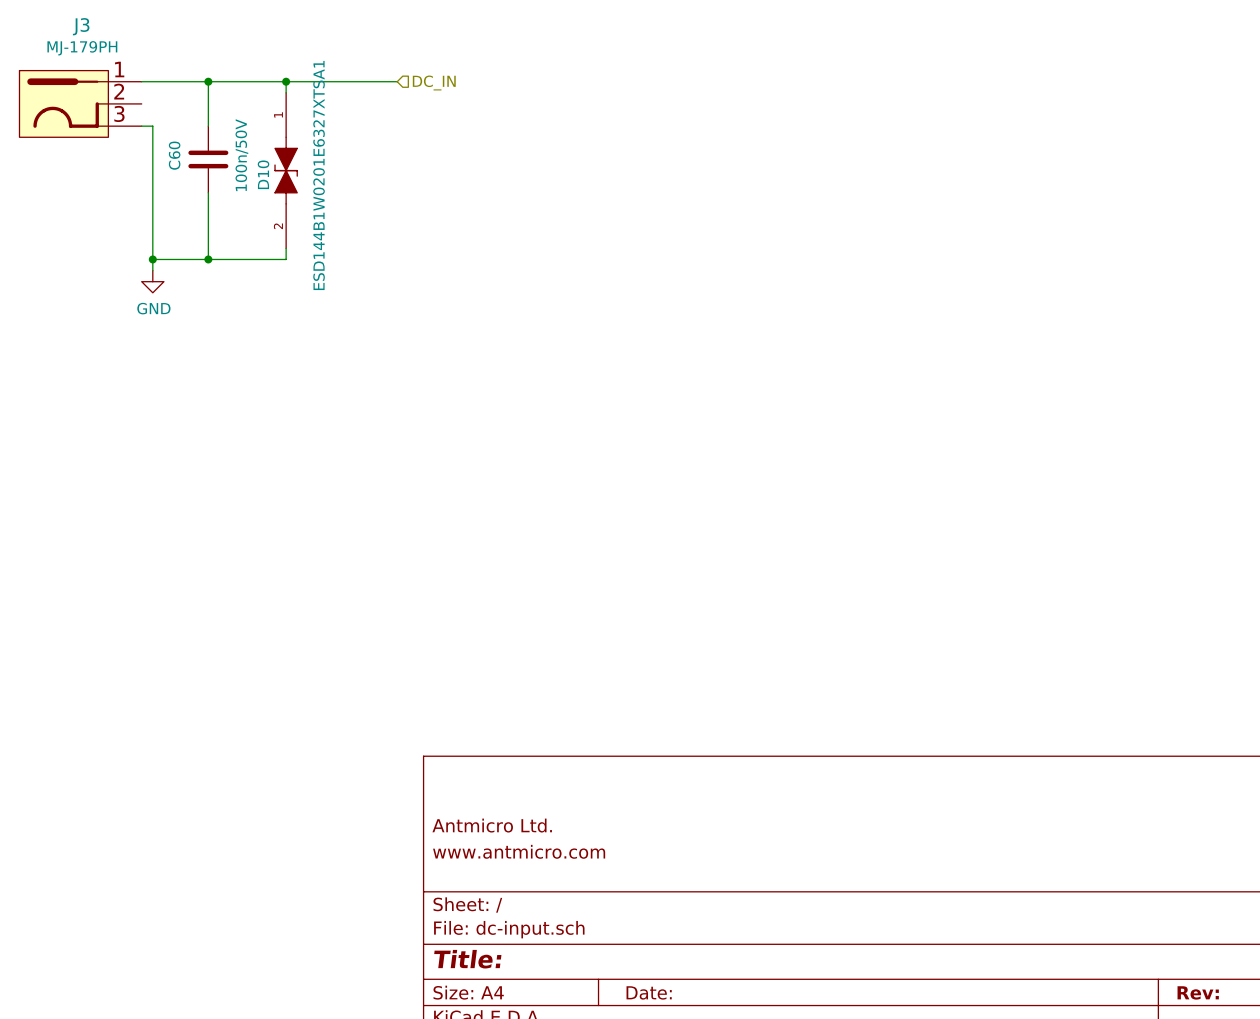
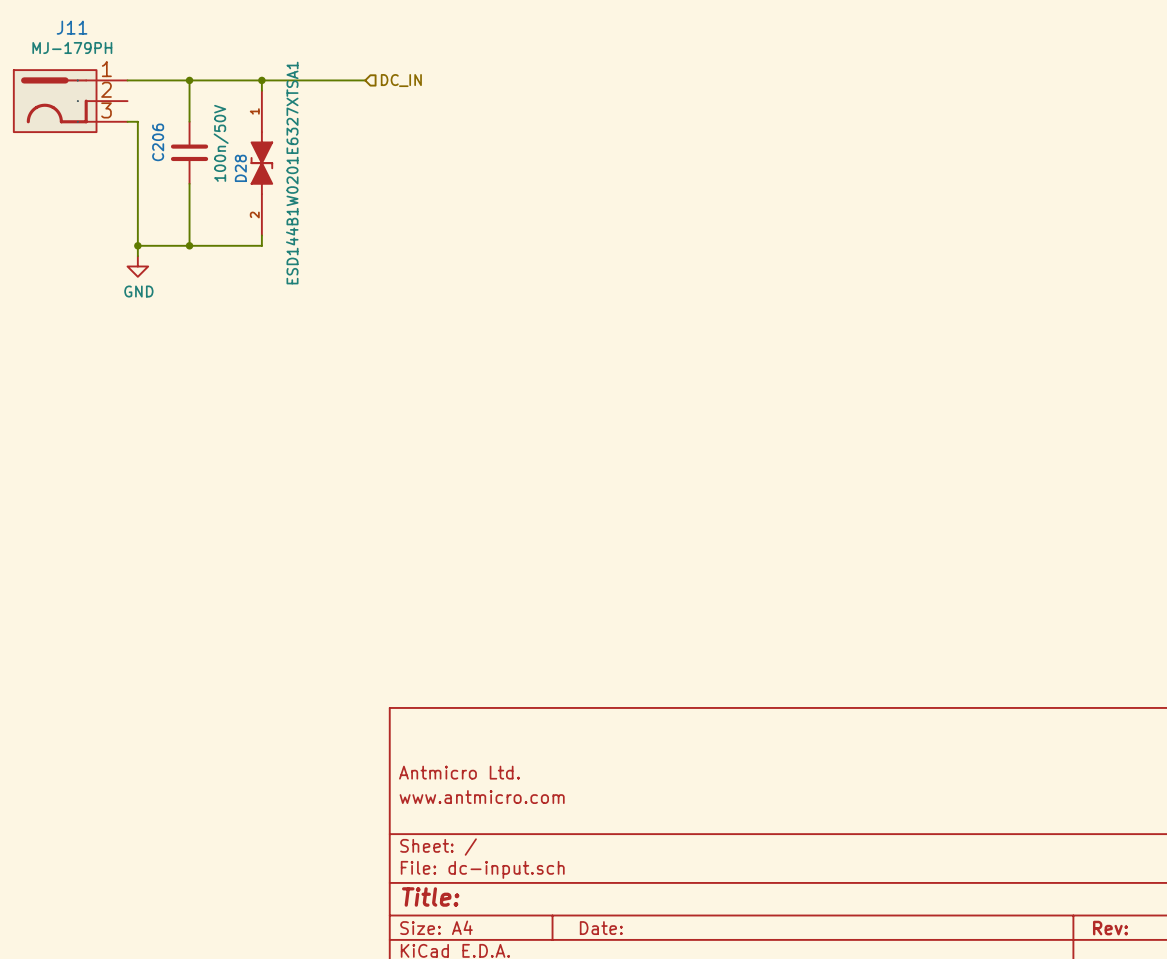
J3 name: J3 (81, 26) -> J11 (72, 27)
C60 name: C60 (174, 155) -> C206 (158, 142)
D10 name: D10 (263, 174) -> D28 (240, 168)

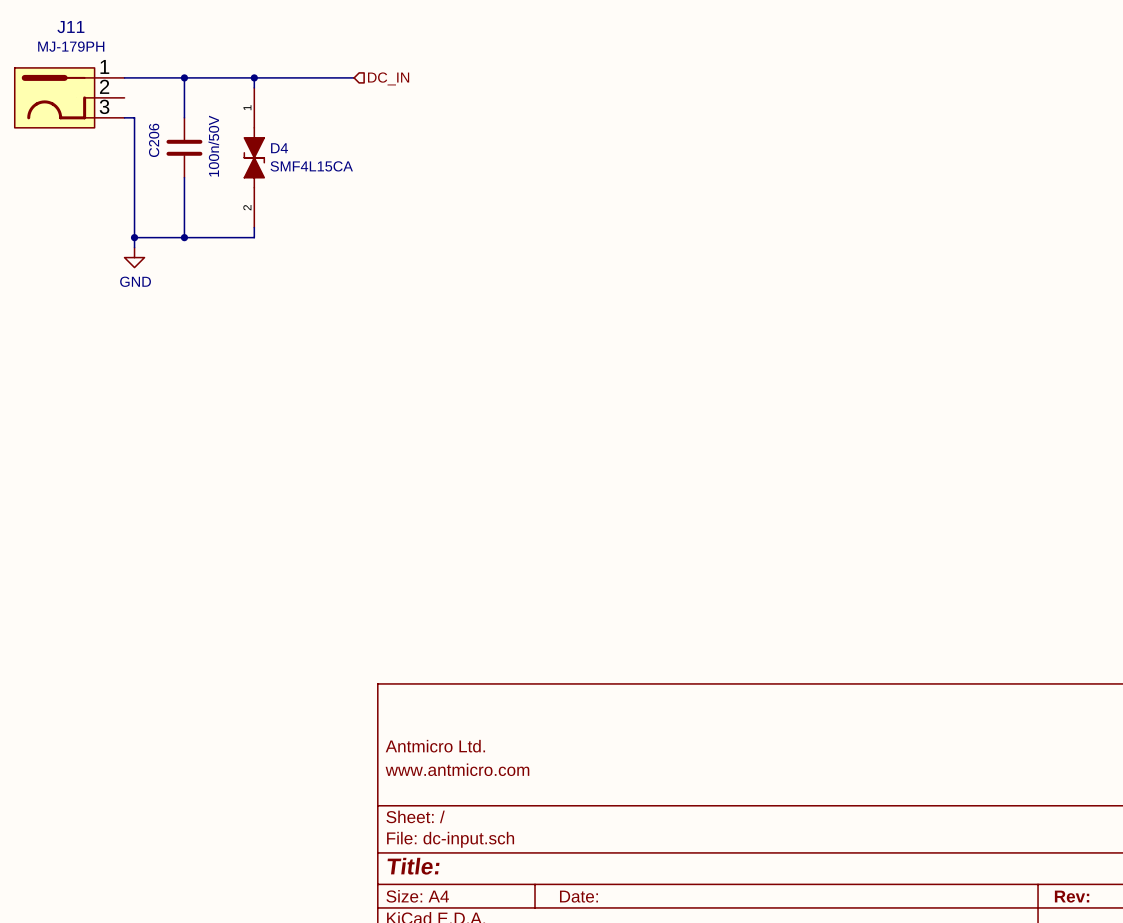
D28 name: D28 (240, 168) -> D4 (279, 148)
D28 value: ESD144B1W0201E6327XTSA1 (292, 173) -> SMF4L15CA (311, 166)

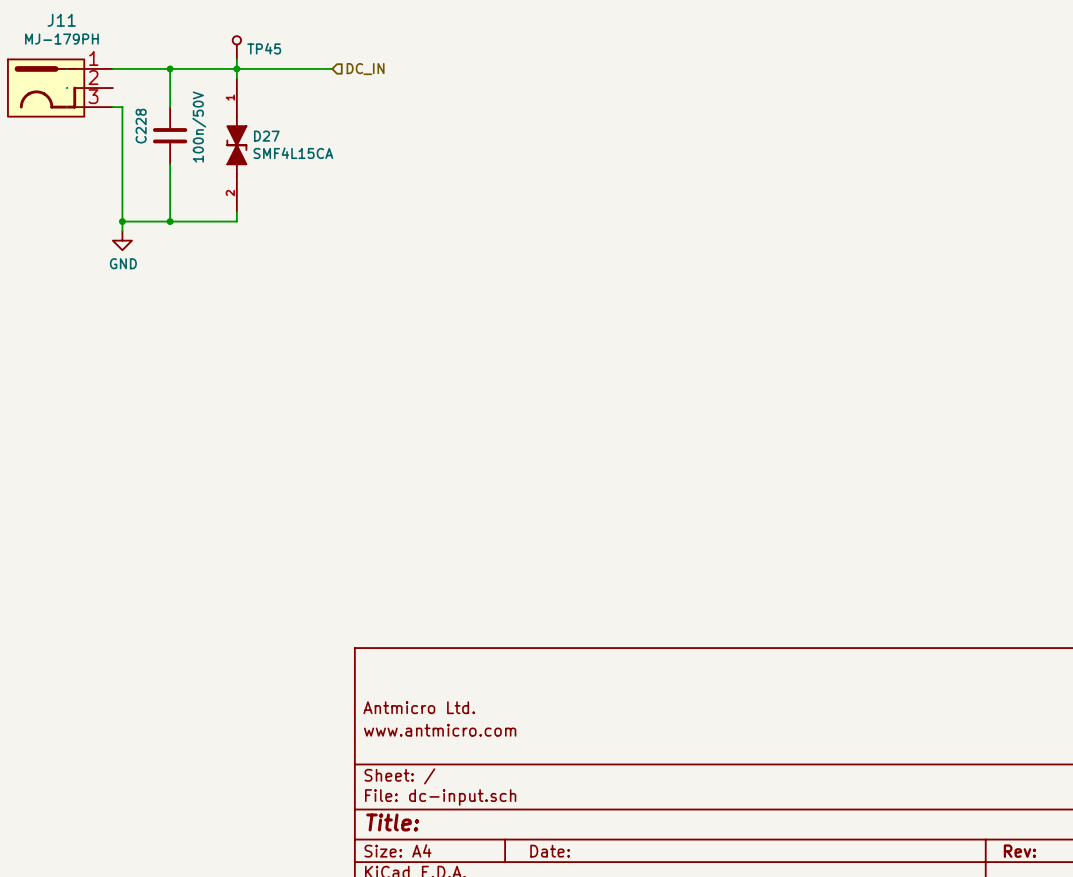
TP45: none -> (236, 47)
wire: none -> (236, 59) (236, 68)
C206 name: C206 (154, 140) -> C228 (141, 126)
D4 name: D4 (279, 148) -> D27 (266, 136)

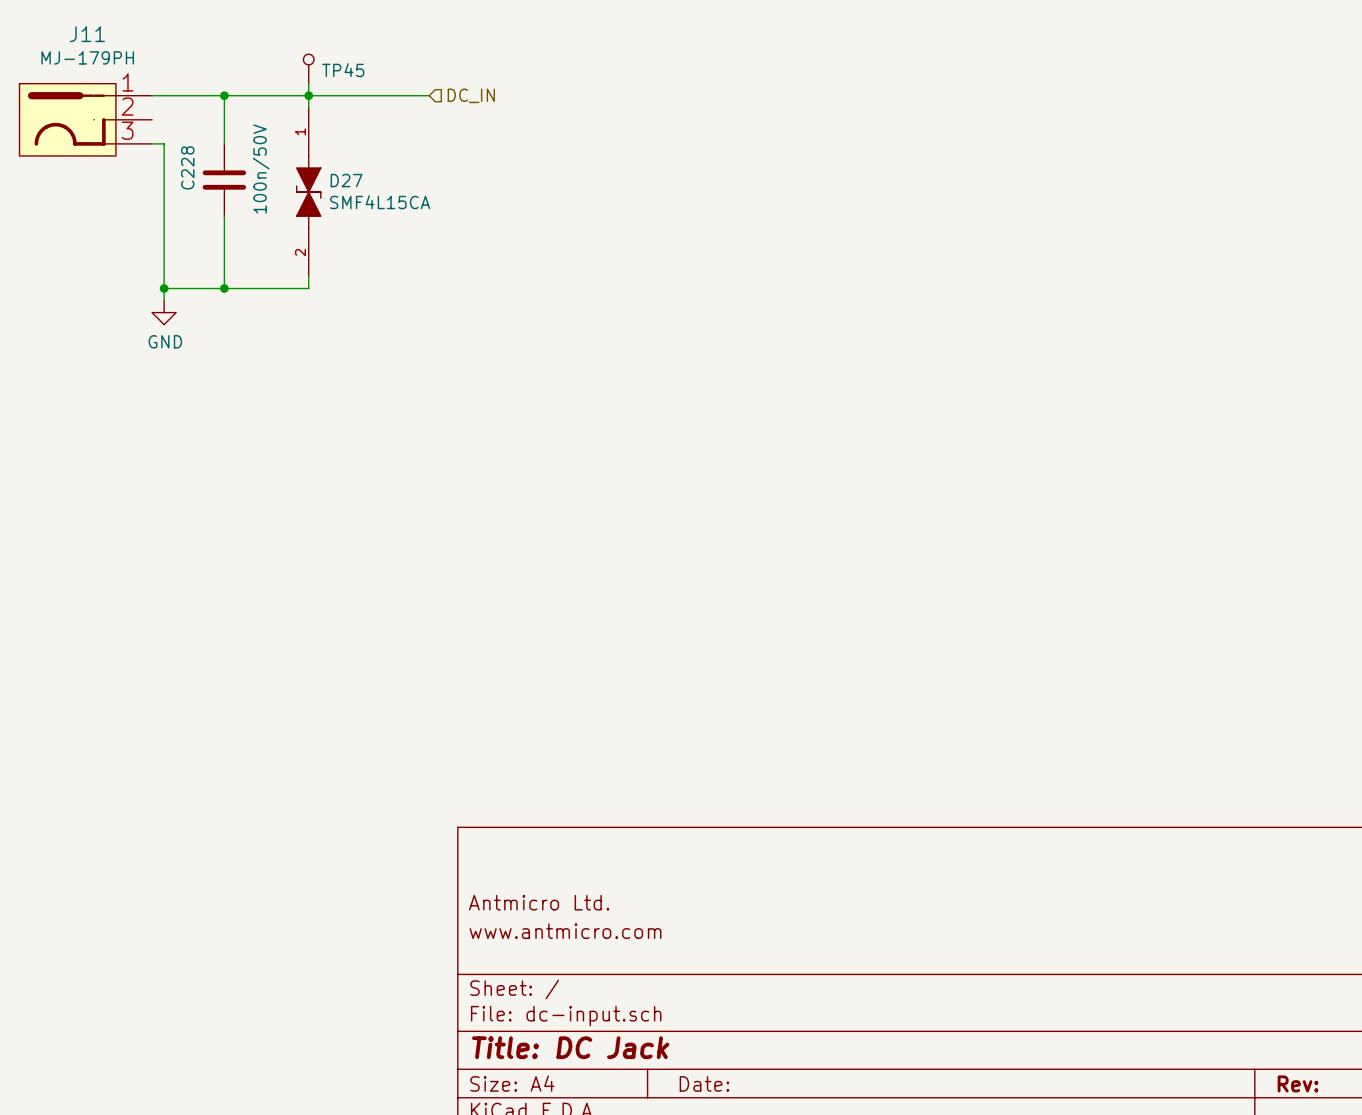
title block: Title: (392, 822) -> Title: DC Jack (570, 1047)

